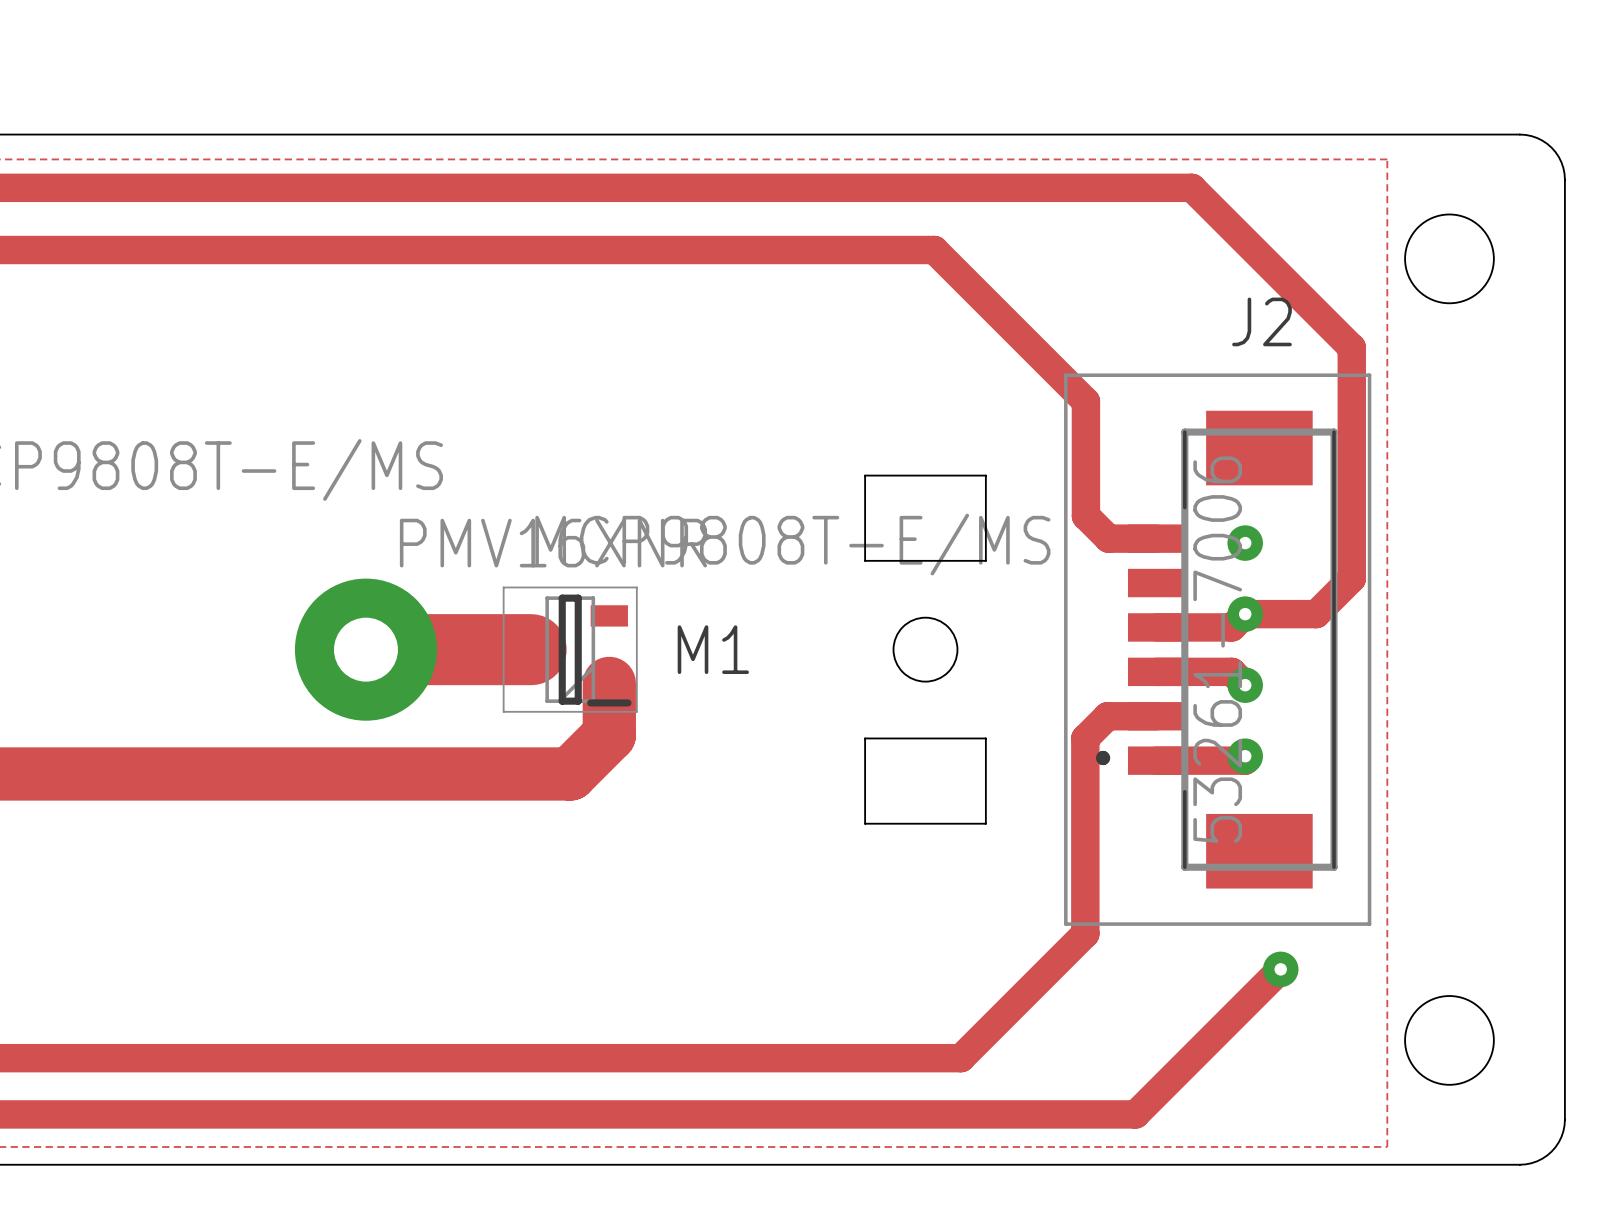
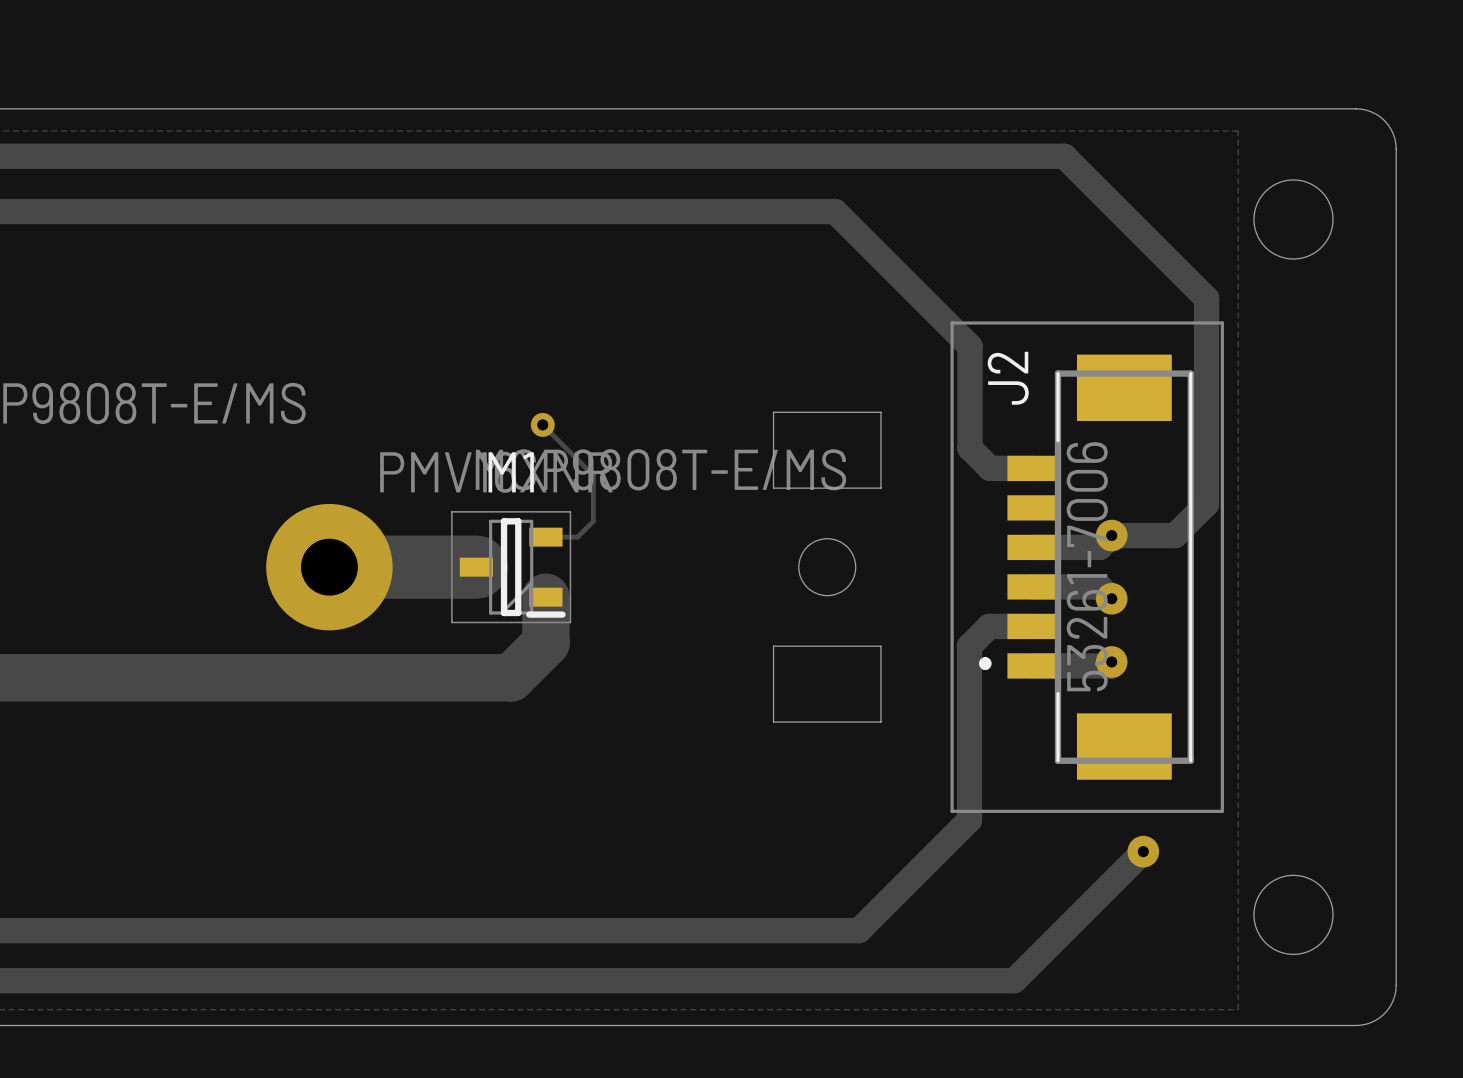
J2 name rotation: 0° (1262, 321) -> 90° counterclockwise (1008, 378)
J2 name position: J2 (1262, 321) -> J2 (1008, 378)
track: none -> (542, 424) (593, 475) (593, 521) (577, 537) (545, 537)
via: none -> (542, 424)
via: (1245, 543) -> none
M1 name position: M1 (713, 649) -> M1 (511, 472)

